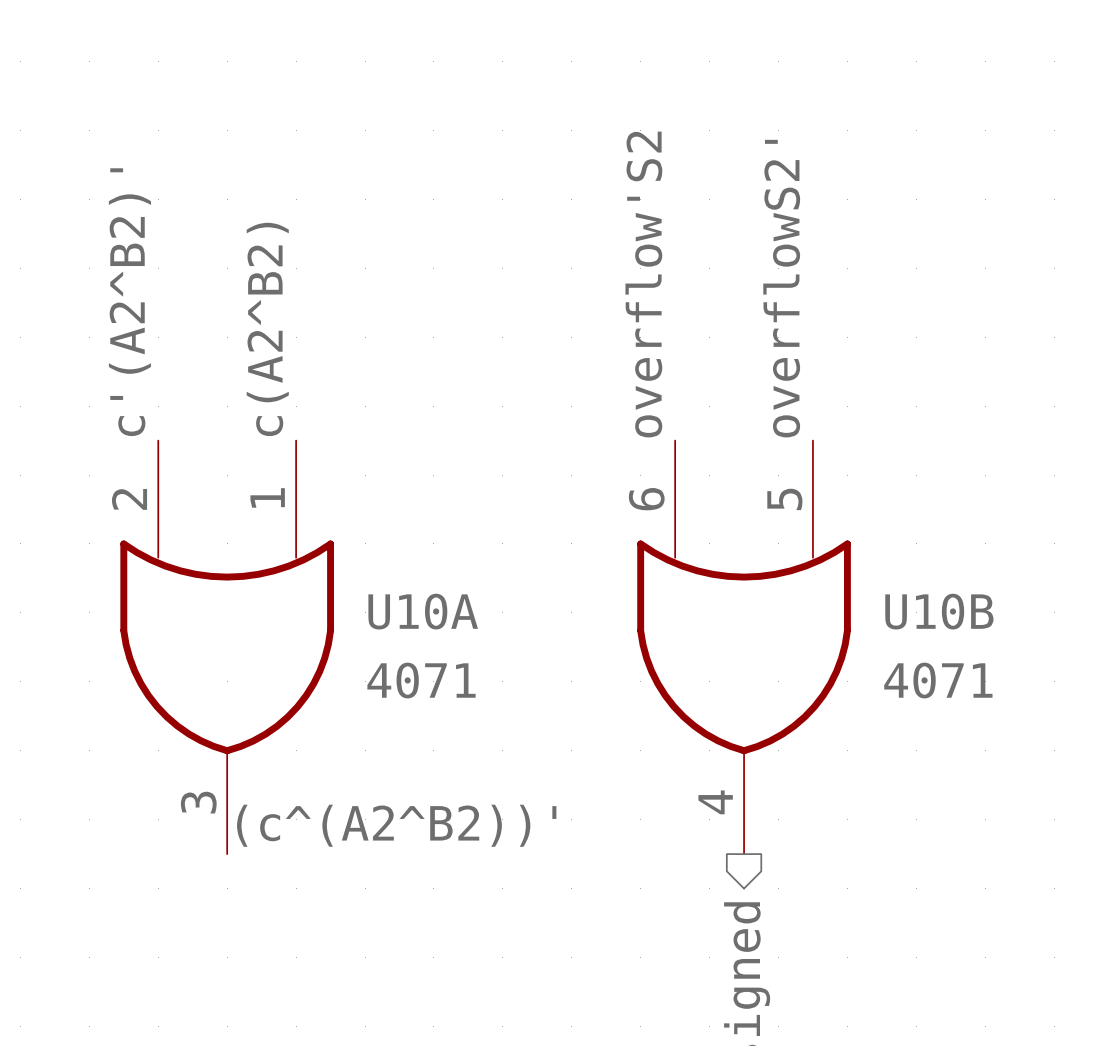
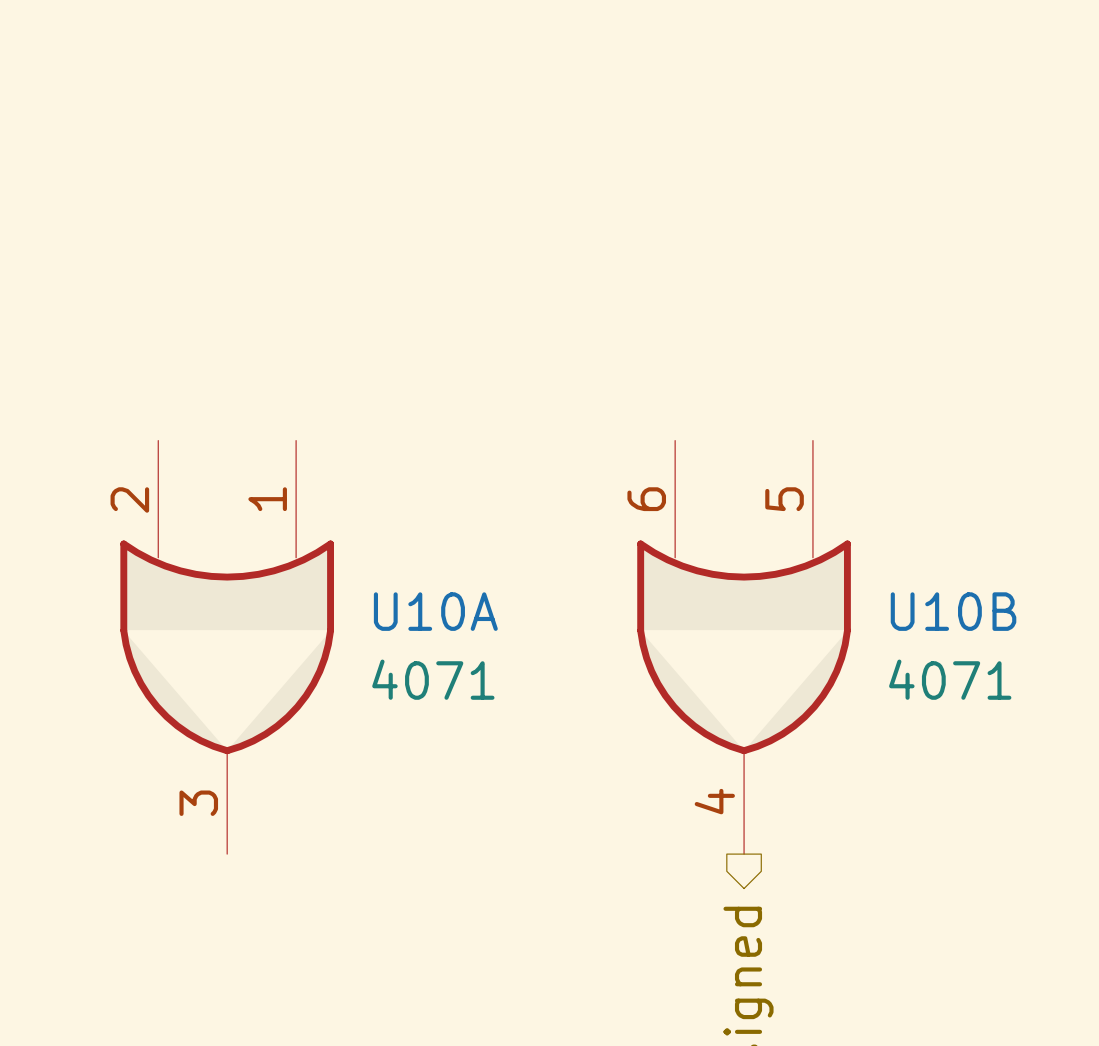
label: overflow'S2 (643, 284) -> none
label: overflowS2' (781, 288) -> none
label: c'(A2^B2)' (129, 302) -> none
label: c(A2^B2) (267, 329) -> none
label: (c^(A2^B2))' (396, 825) -> none

